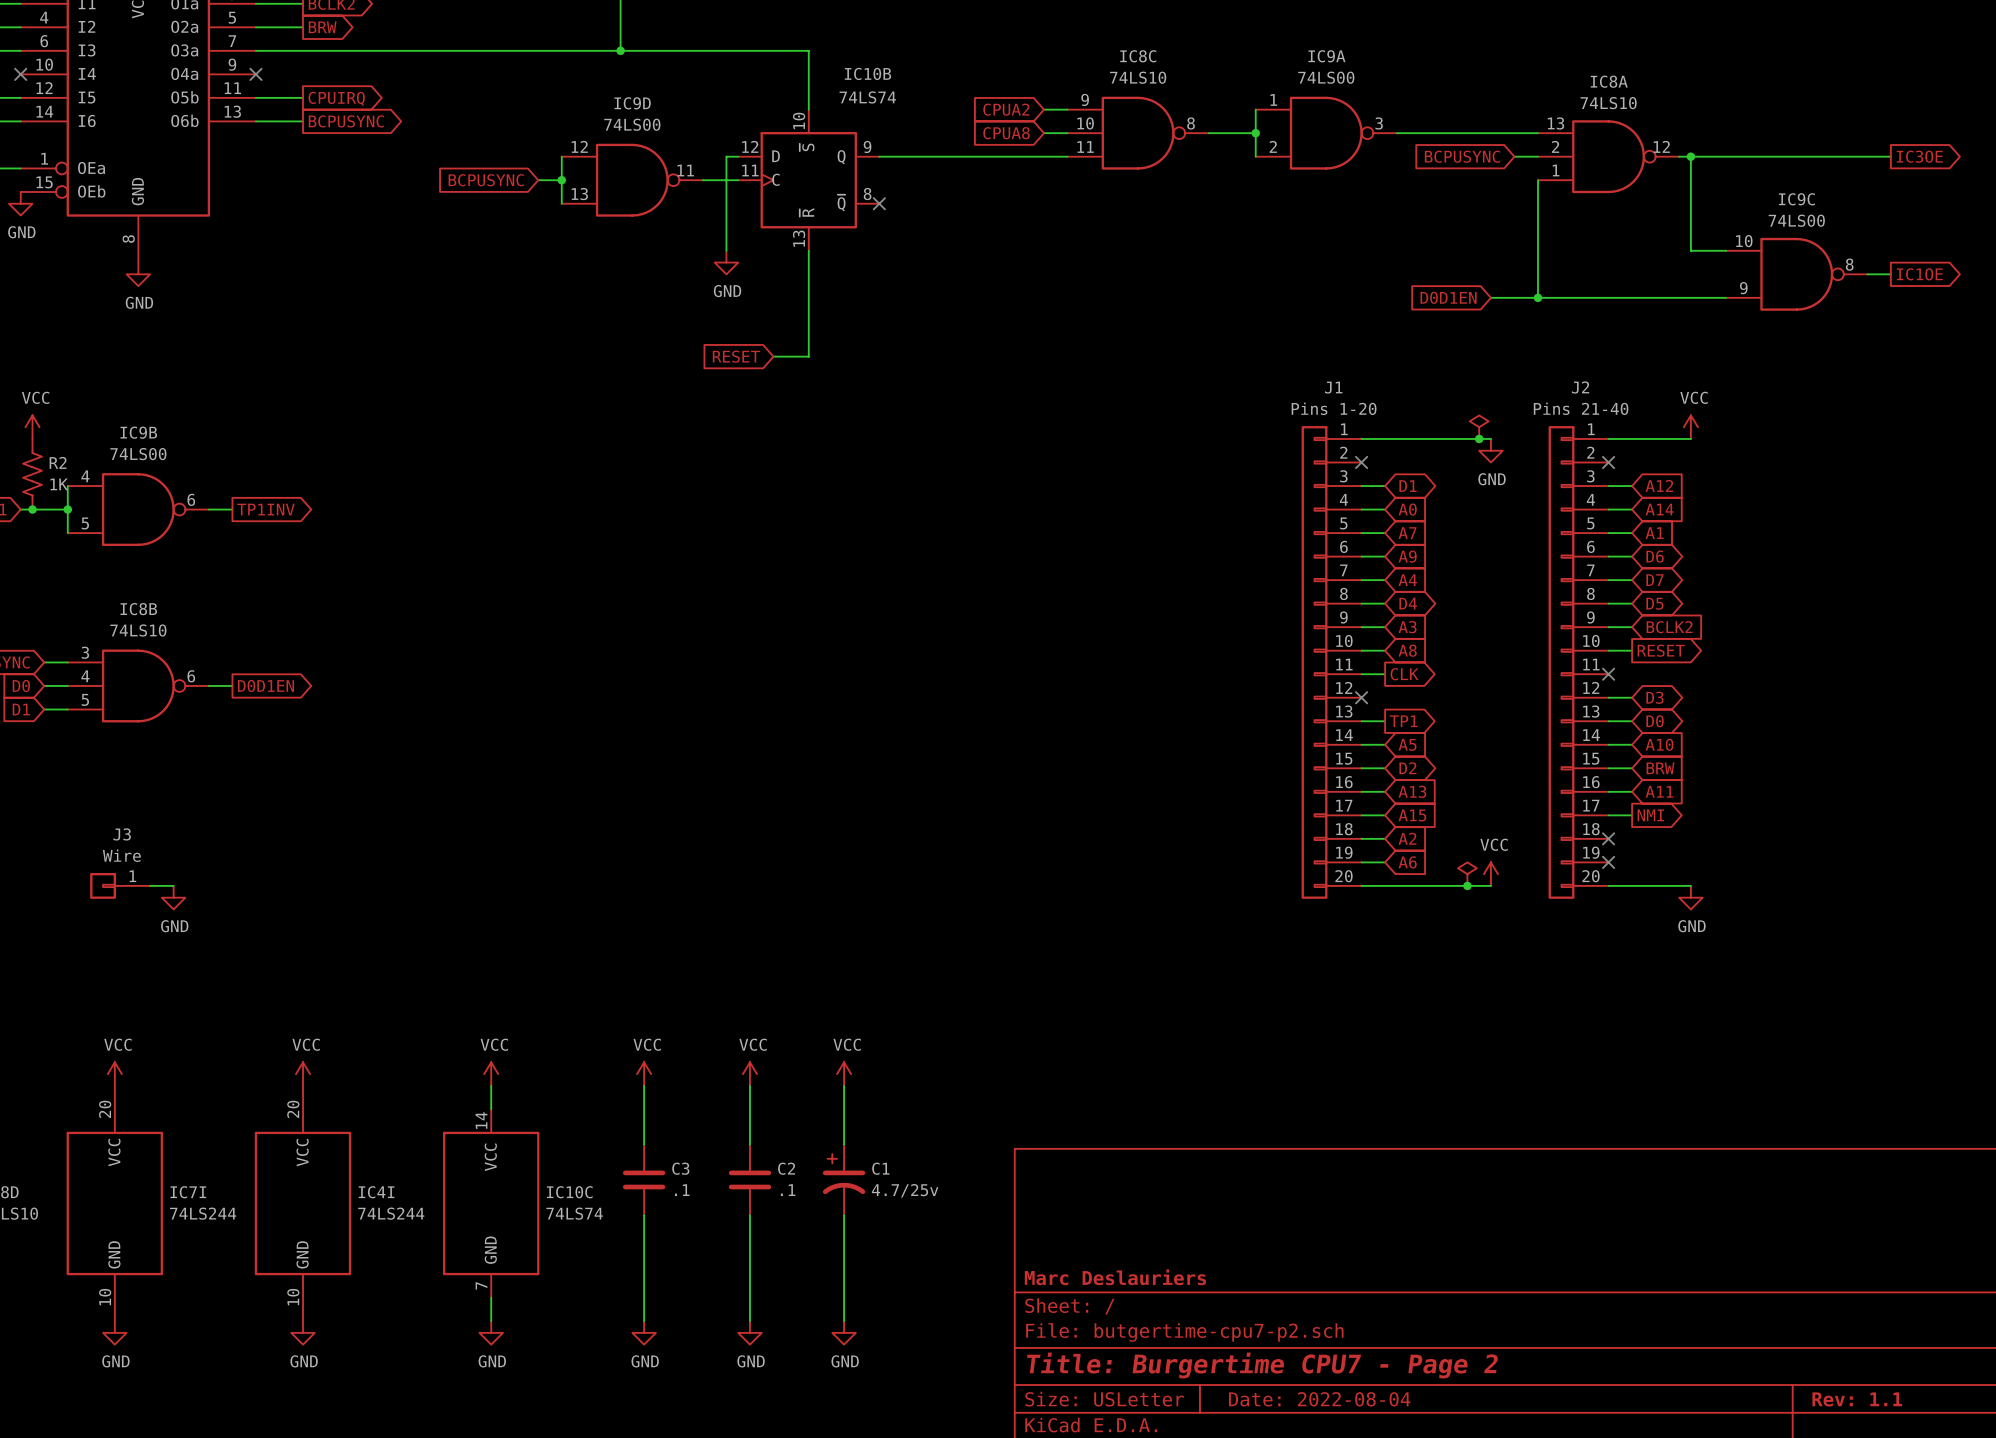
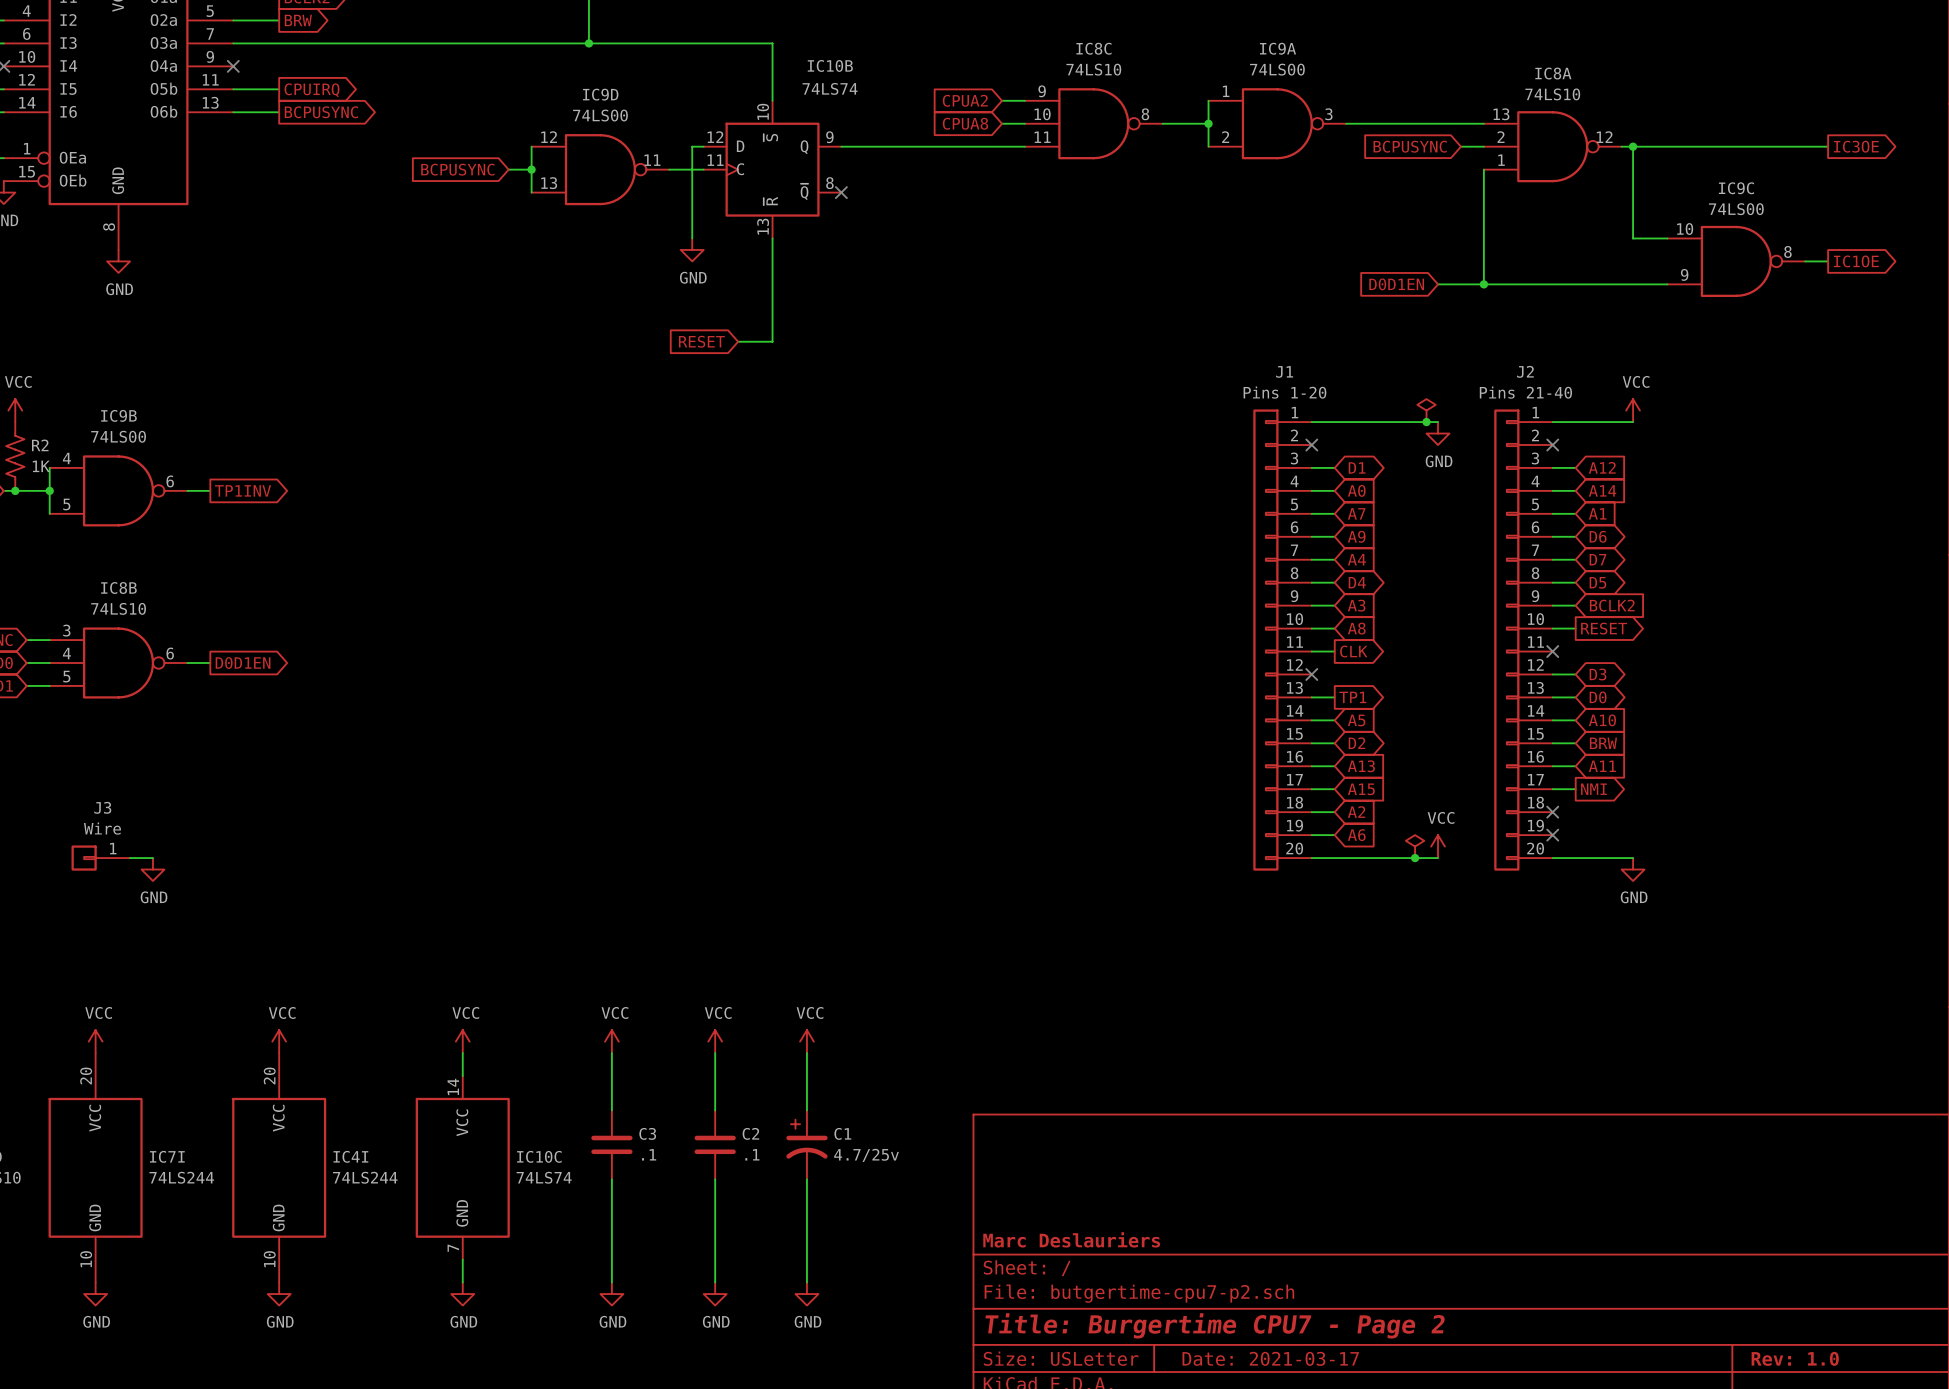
title block: Date: 2022-08-04 (1319, 1399) -> Date: 2021-03-17 (1270, 1358)
title block: Rev: 1.1 (1857, 1399) -> Rev: 1.0 (1795, 1358)

